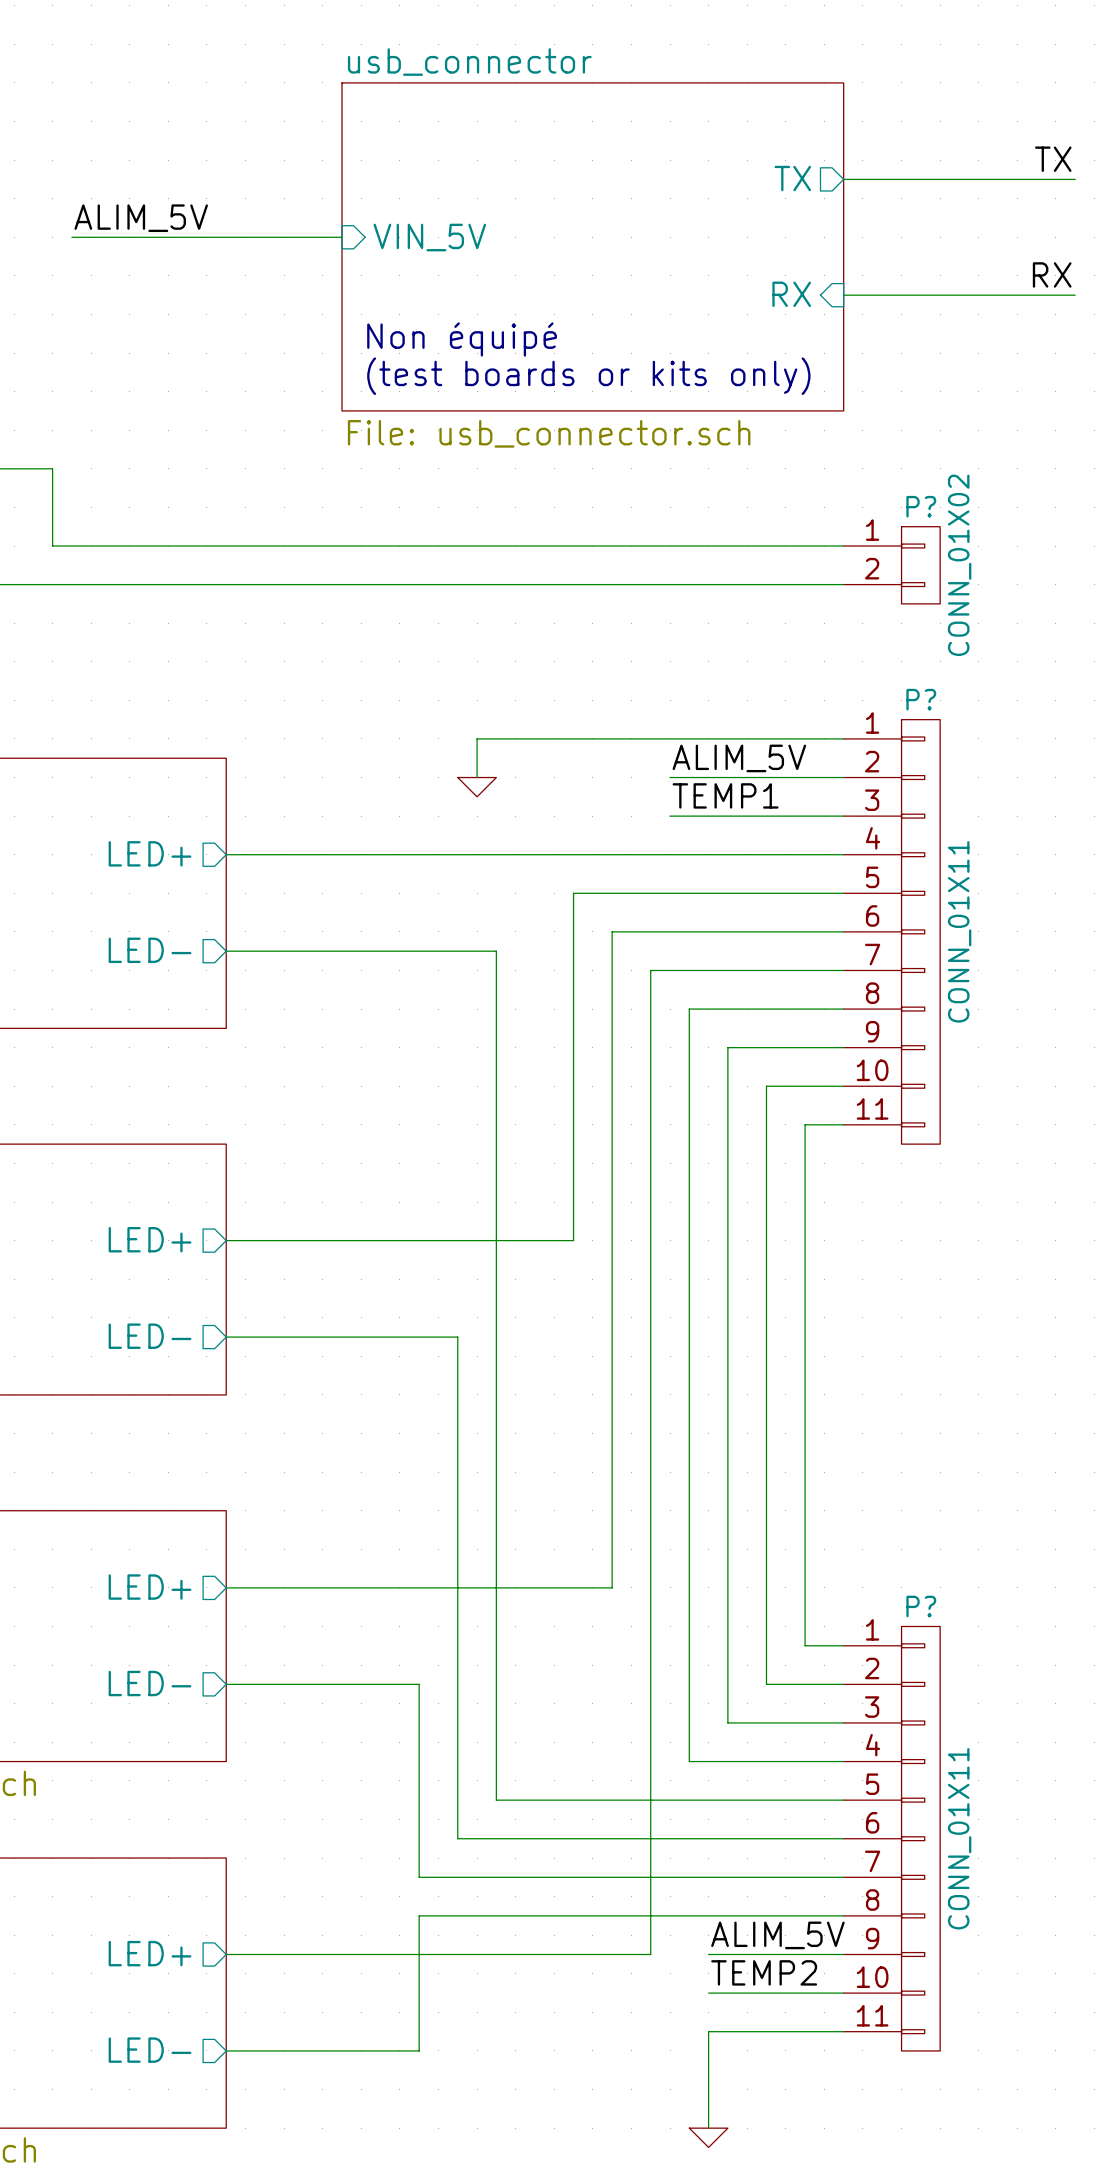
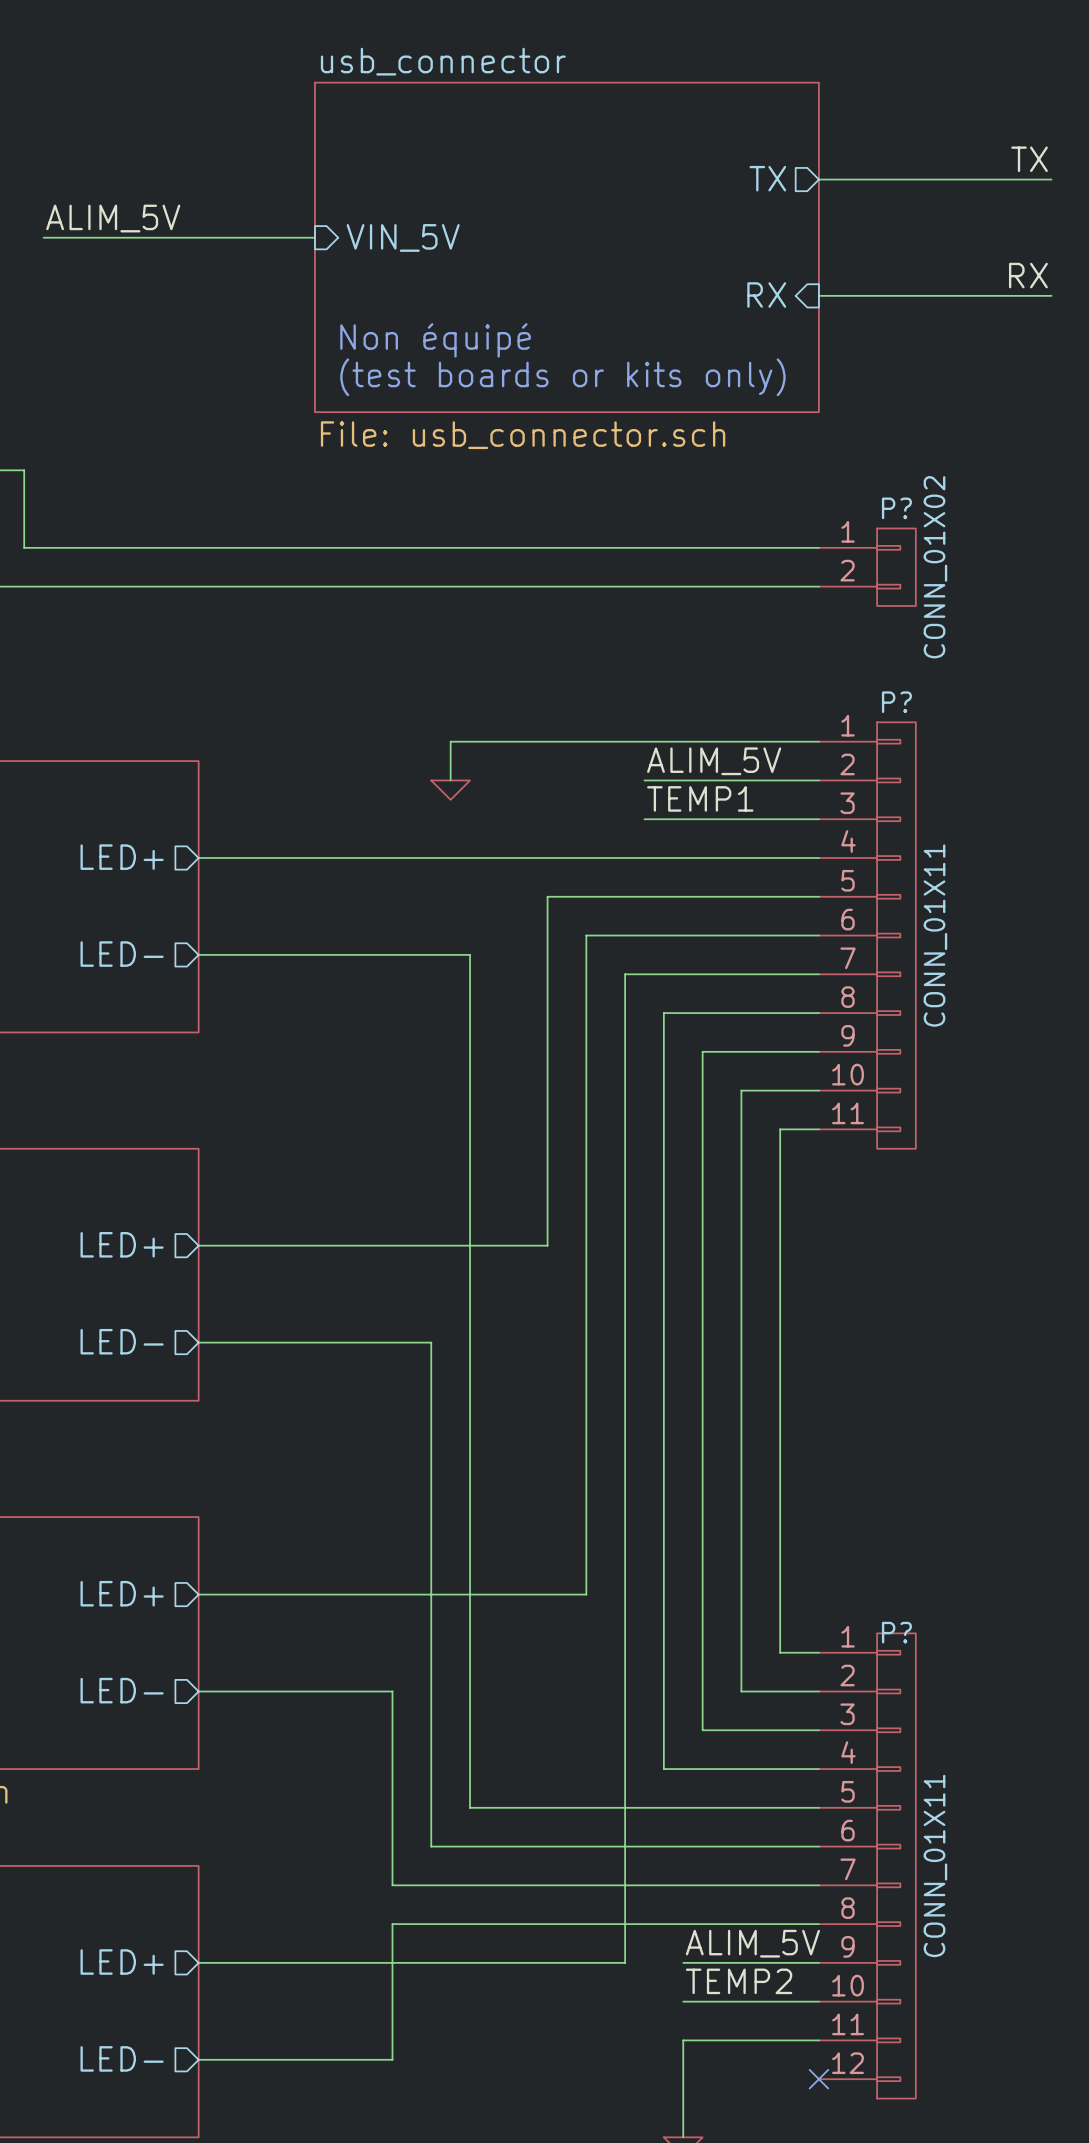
P?: CONN_01X11 (891, 1838) -> none
P?: none -> CONN_01X11 (867, 1865)
no-connect mark: none -> (818, 2079)

